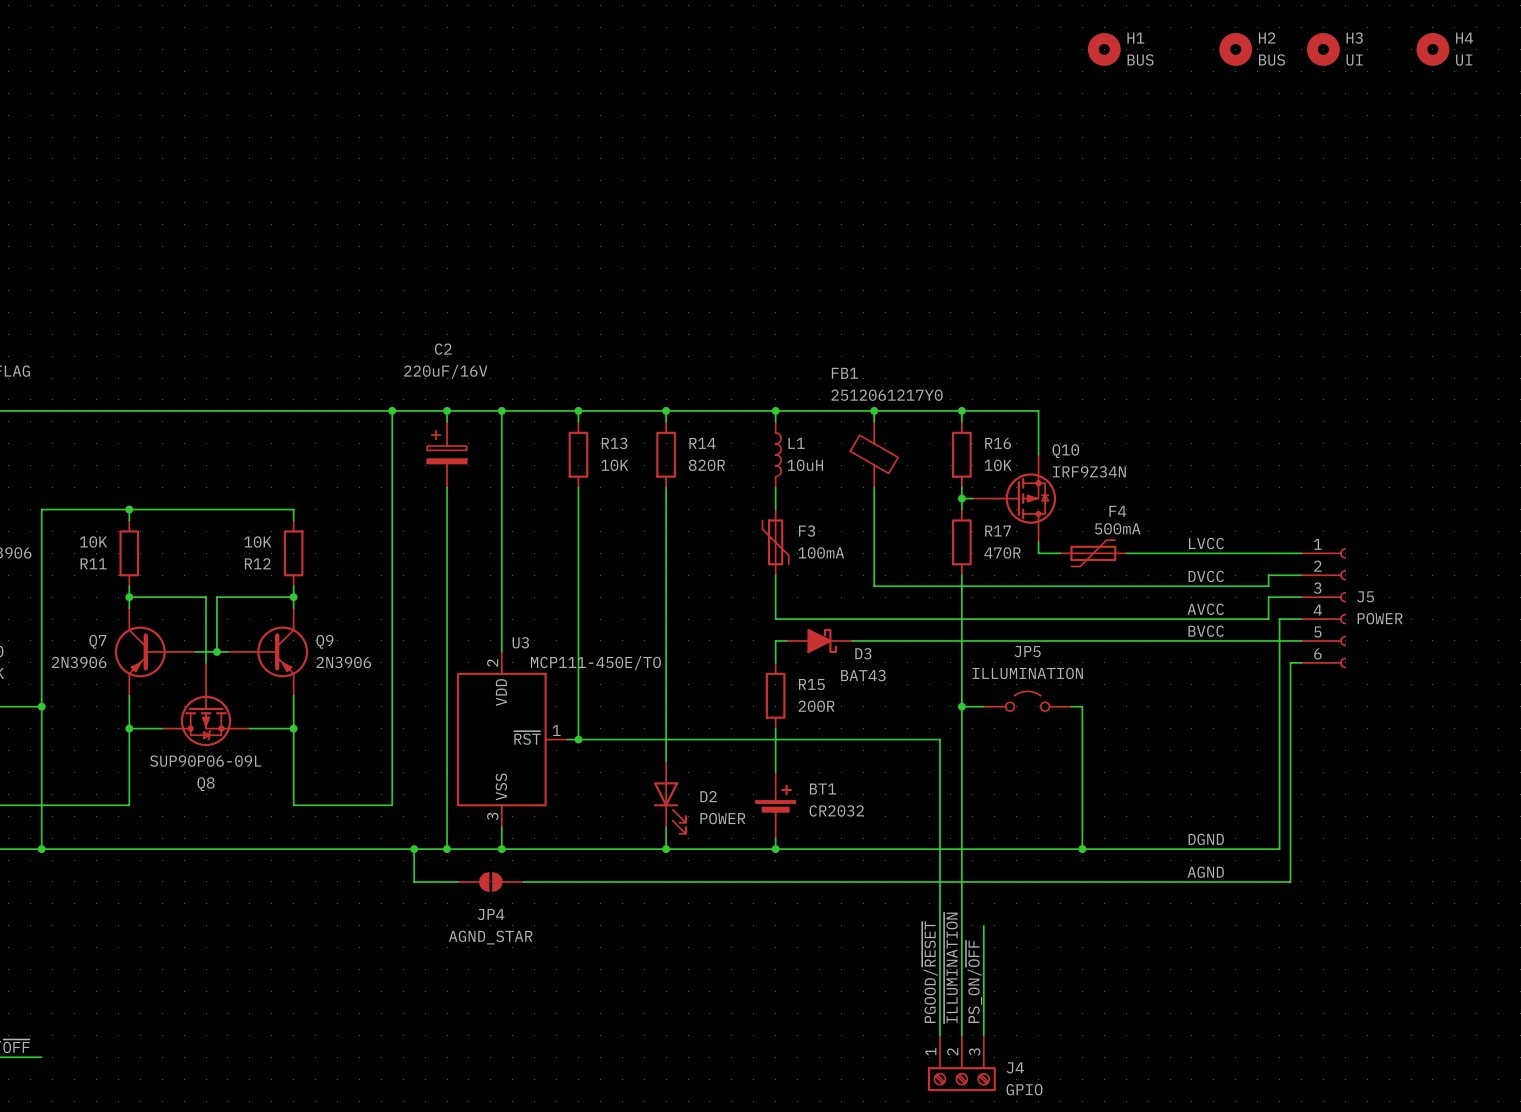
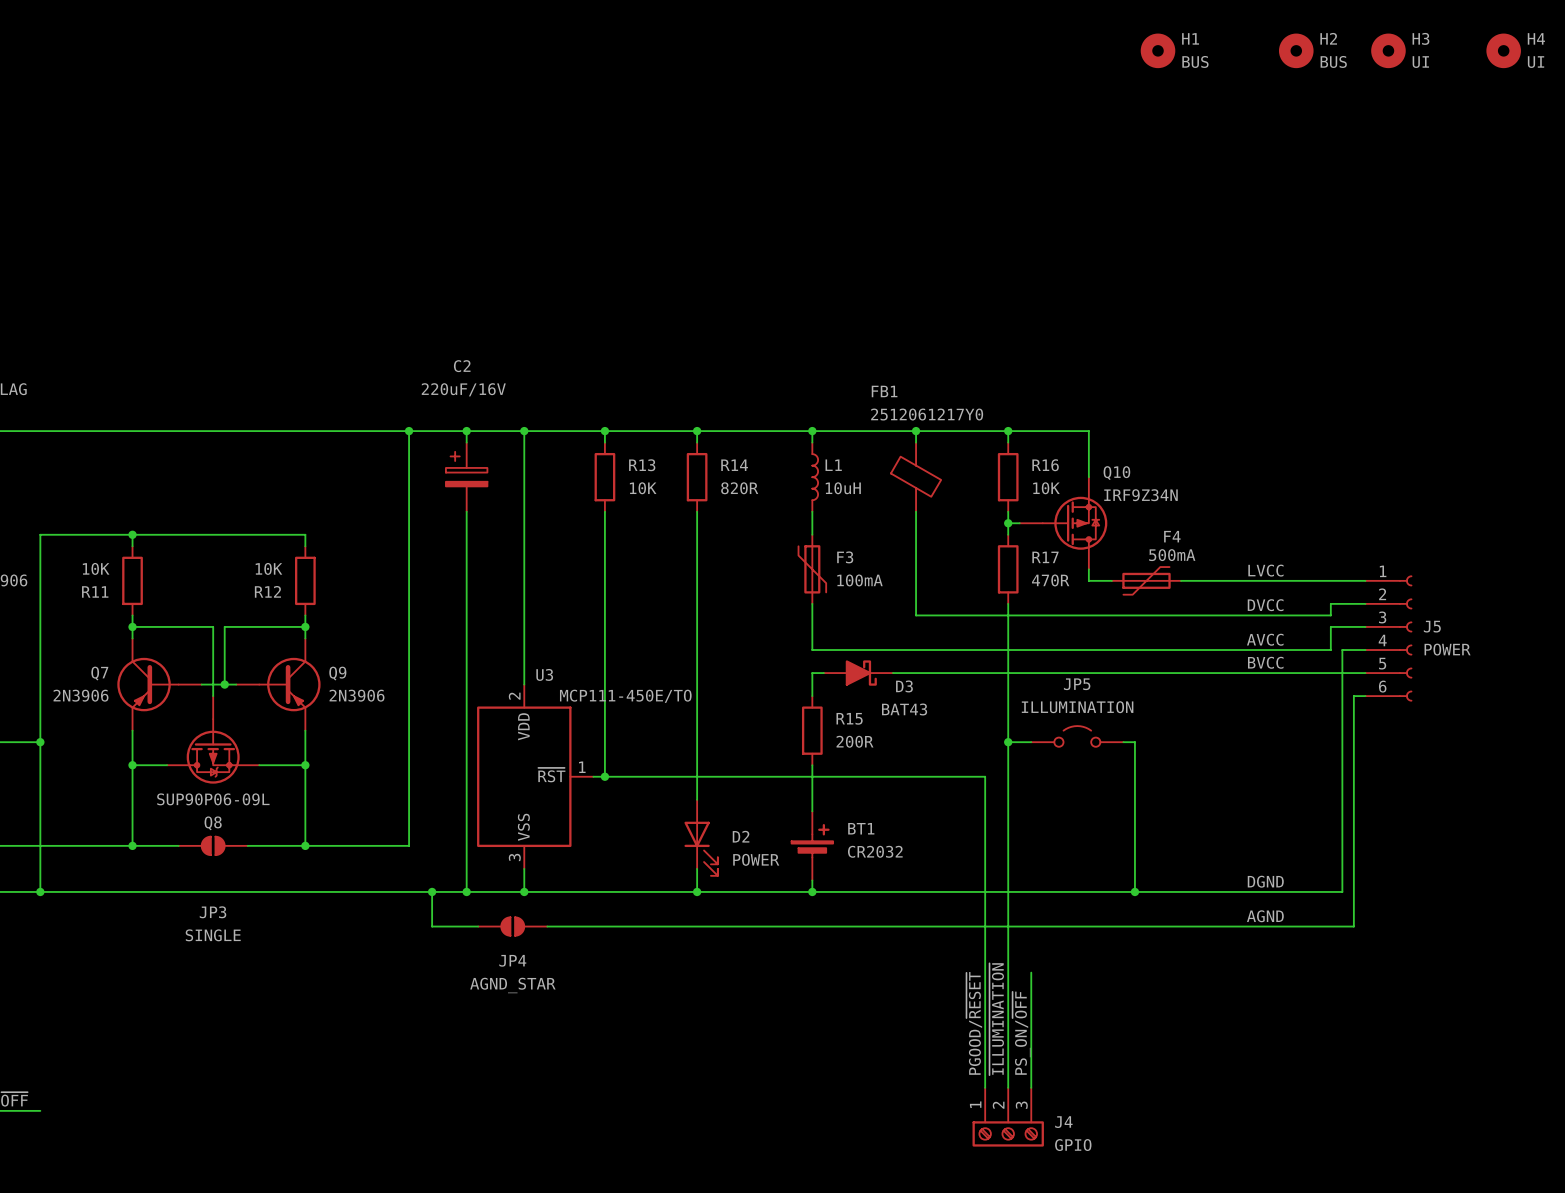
wire: none -> (132, 845) (178, 845)
junction: none -> (132, 845)
JP3: none -> SINGLE (213, 845)
wire: none -> (247, 845) (305, 845)
junction: none -> (305, 845)

